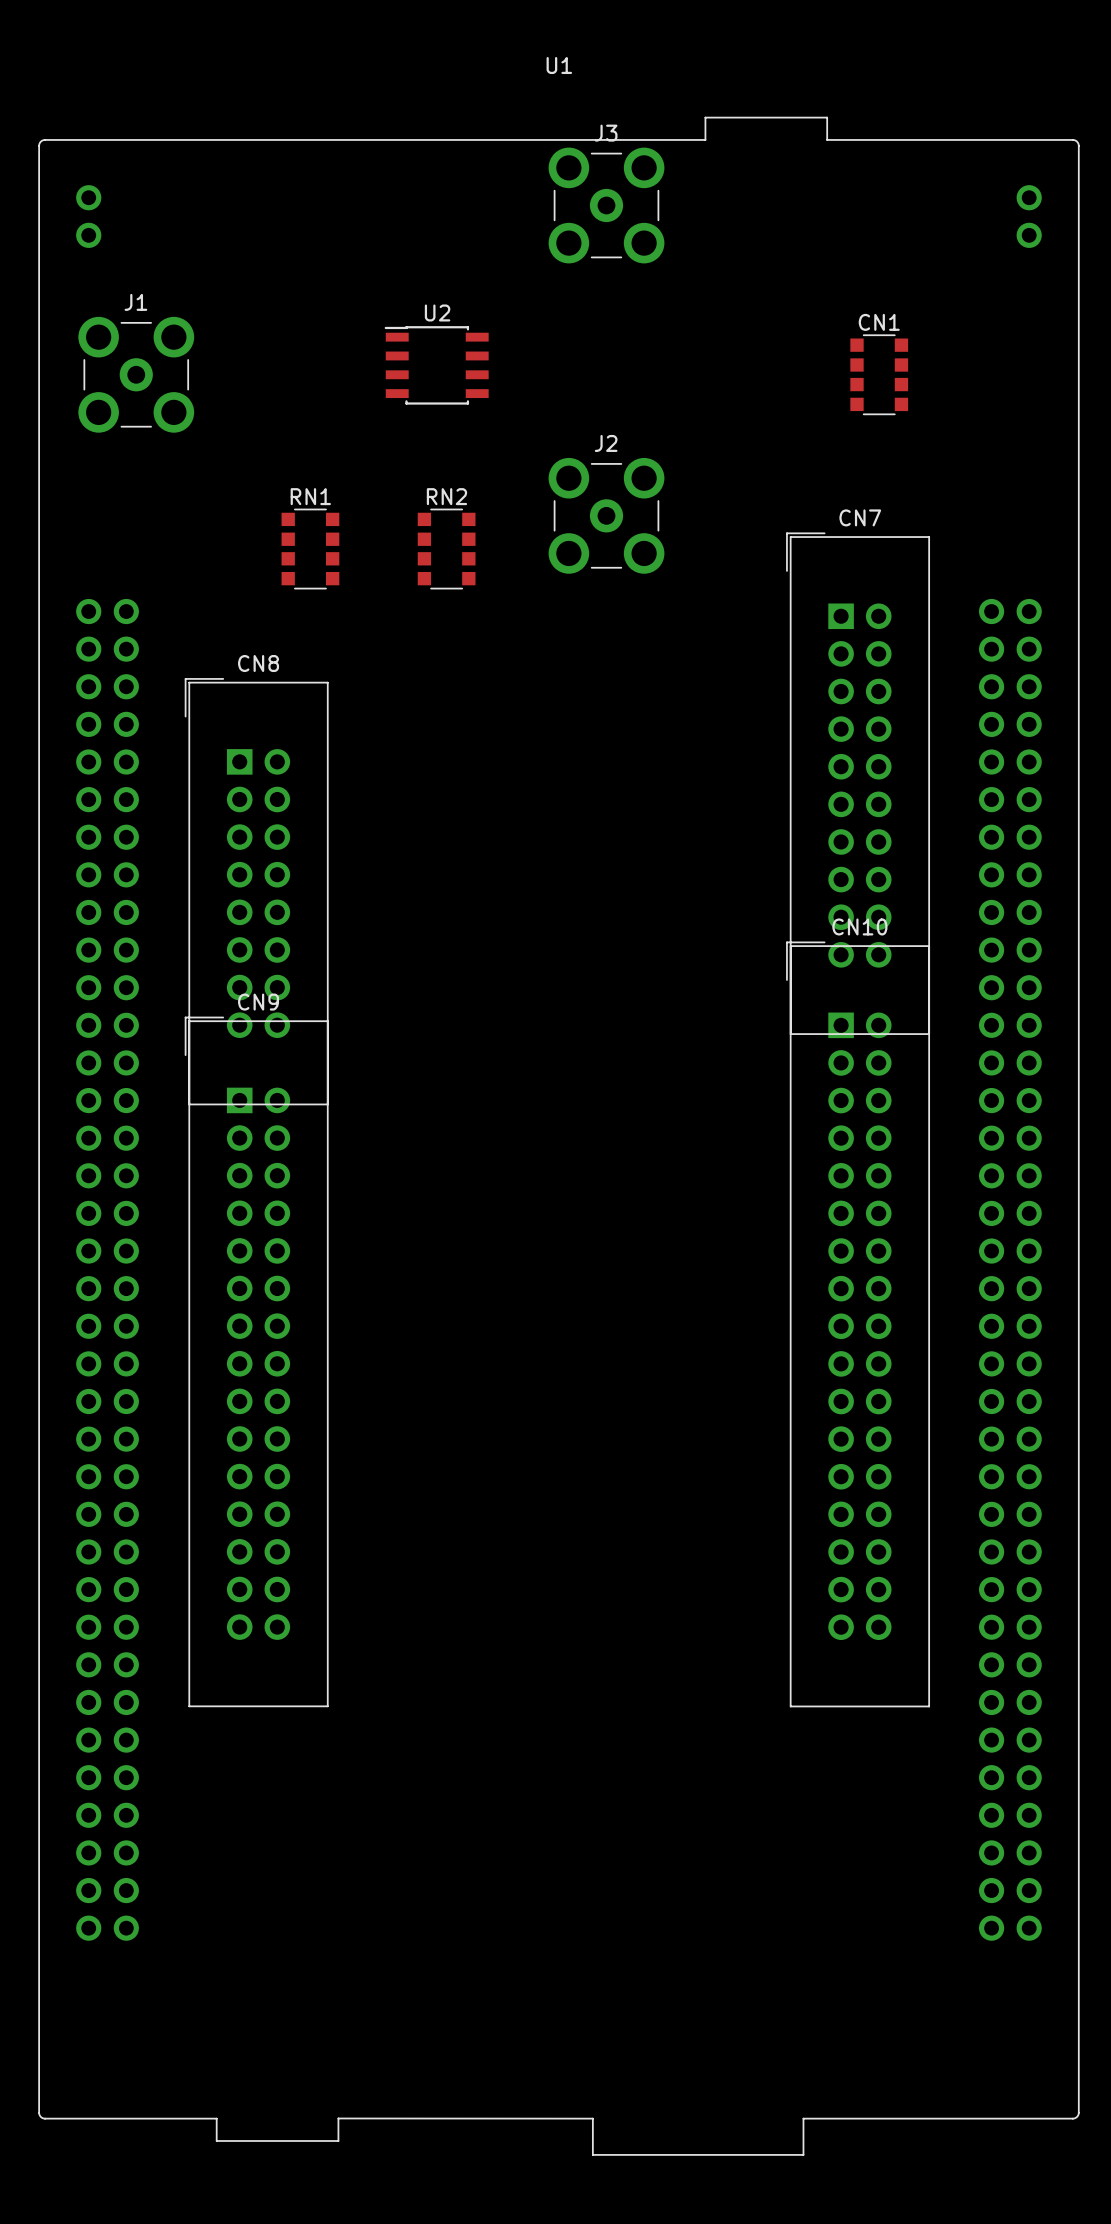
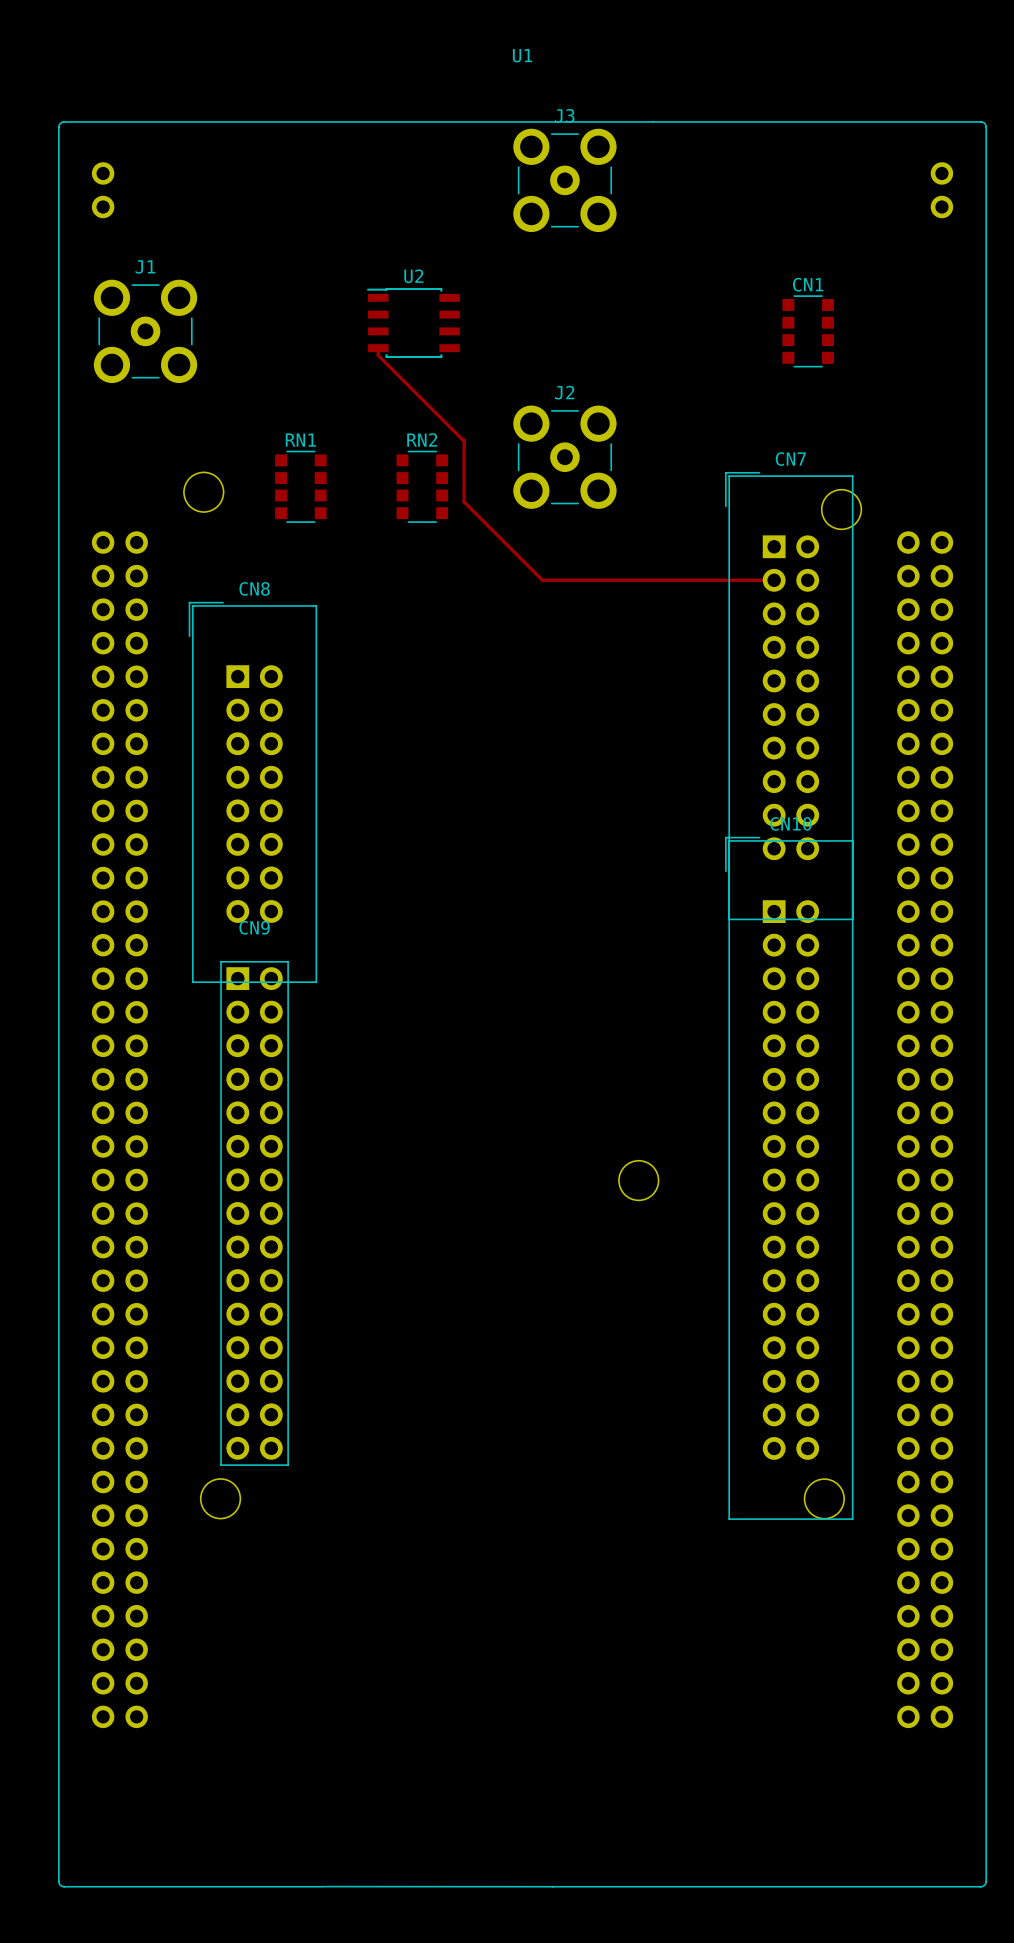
U1 footprint: [38, 116, 1080, 2156] -> [58, 121, 987, 1888]
track: none -> (378, 348) (378, 355) (464, 440) (464, 501) (542, 580) (774, 580)
CN9 name position: CN9 (258, 1002) -> CN9 (254, 927)
CN9 footprint: [184, 1016, 329, 1708] -> [220, 961, 289, 1466]

